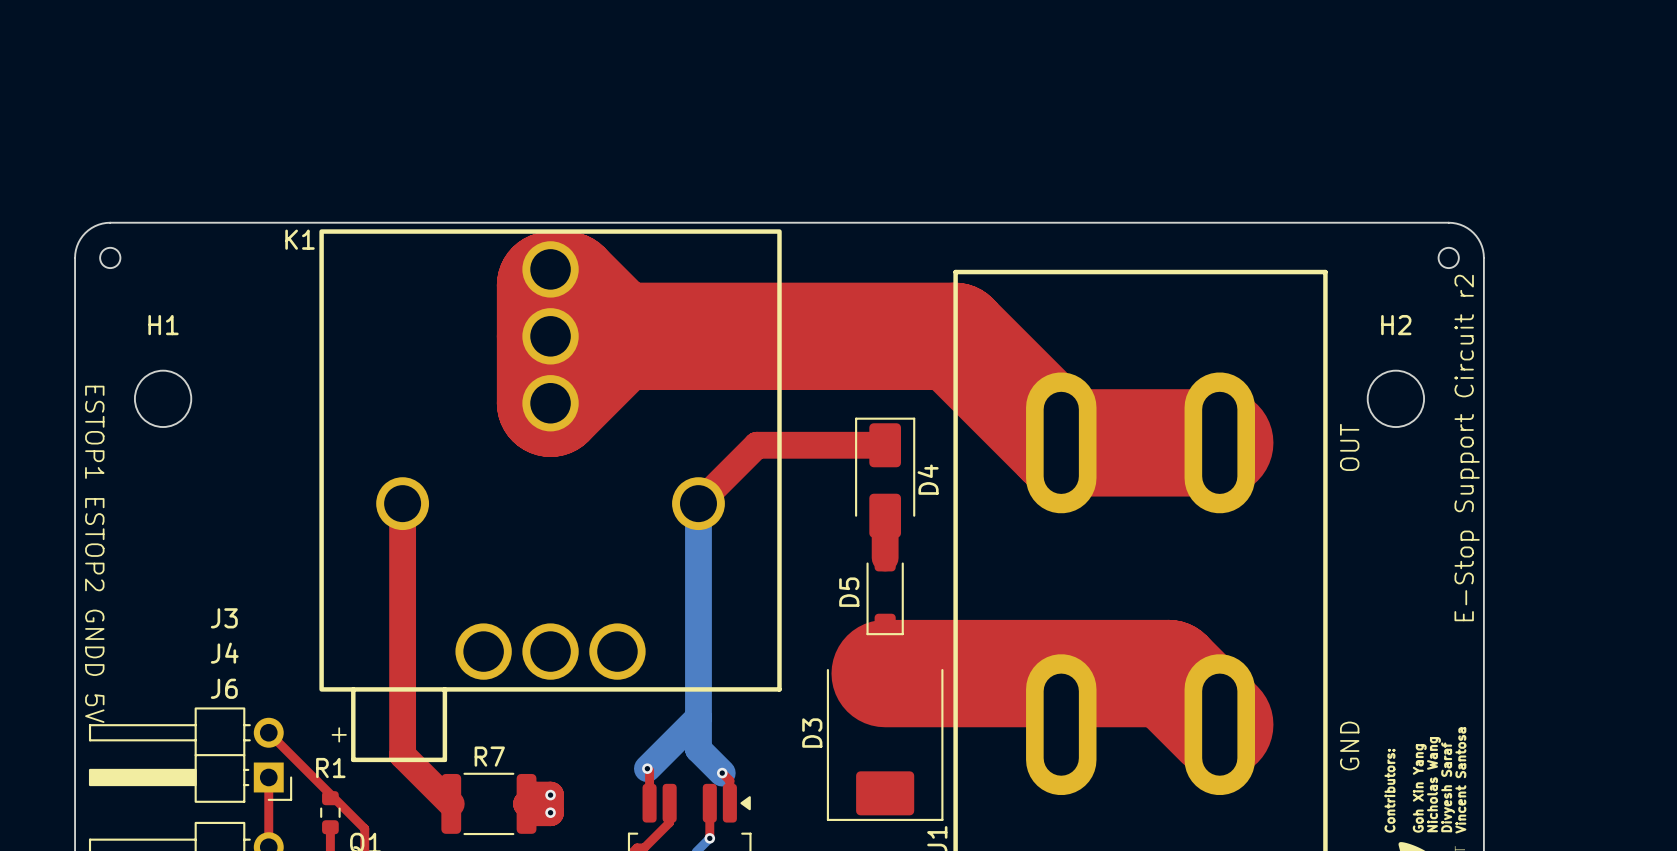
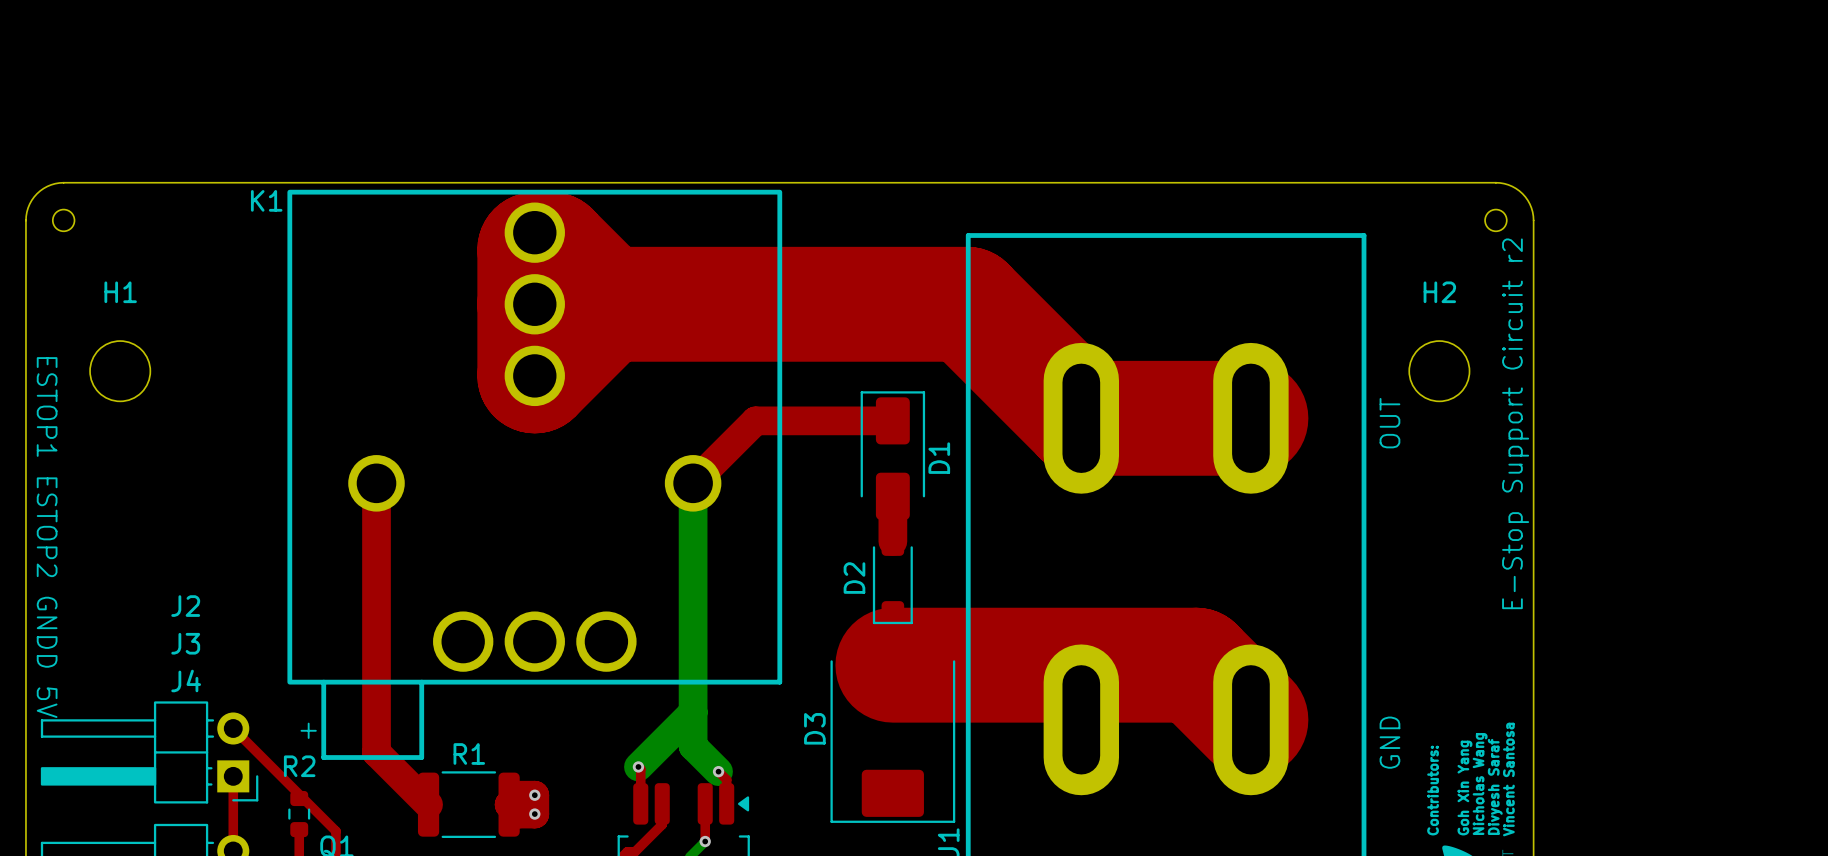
D4 name: D4 (928, 479) -> D1 (939, 458)
D5 name: D5 (849, 592) -> D2 (854, 578)
J3 name: J3 (224, 618) -> J2 (185, 606)
J4 name: J4 (224, 653) -> J3 (185, 643)
J6 name: J6 (224, 688) -> J4 (186, 680)
R7 name: R7 (489, 756) -> R1 (469, 753)
R1 name: R1 (330, 768) -> R2 (299, 766)

